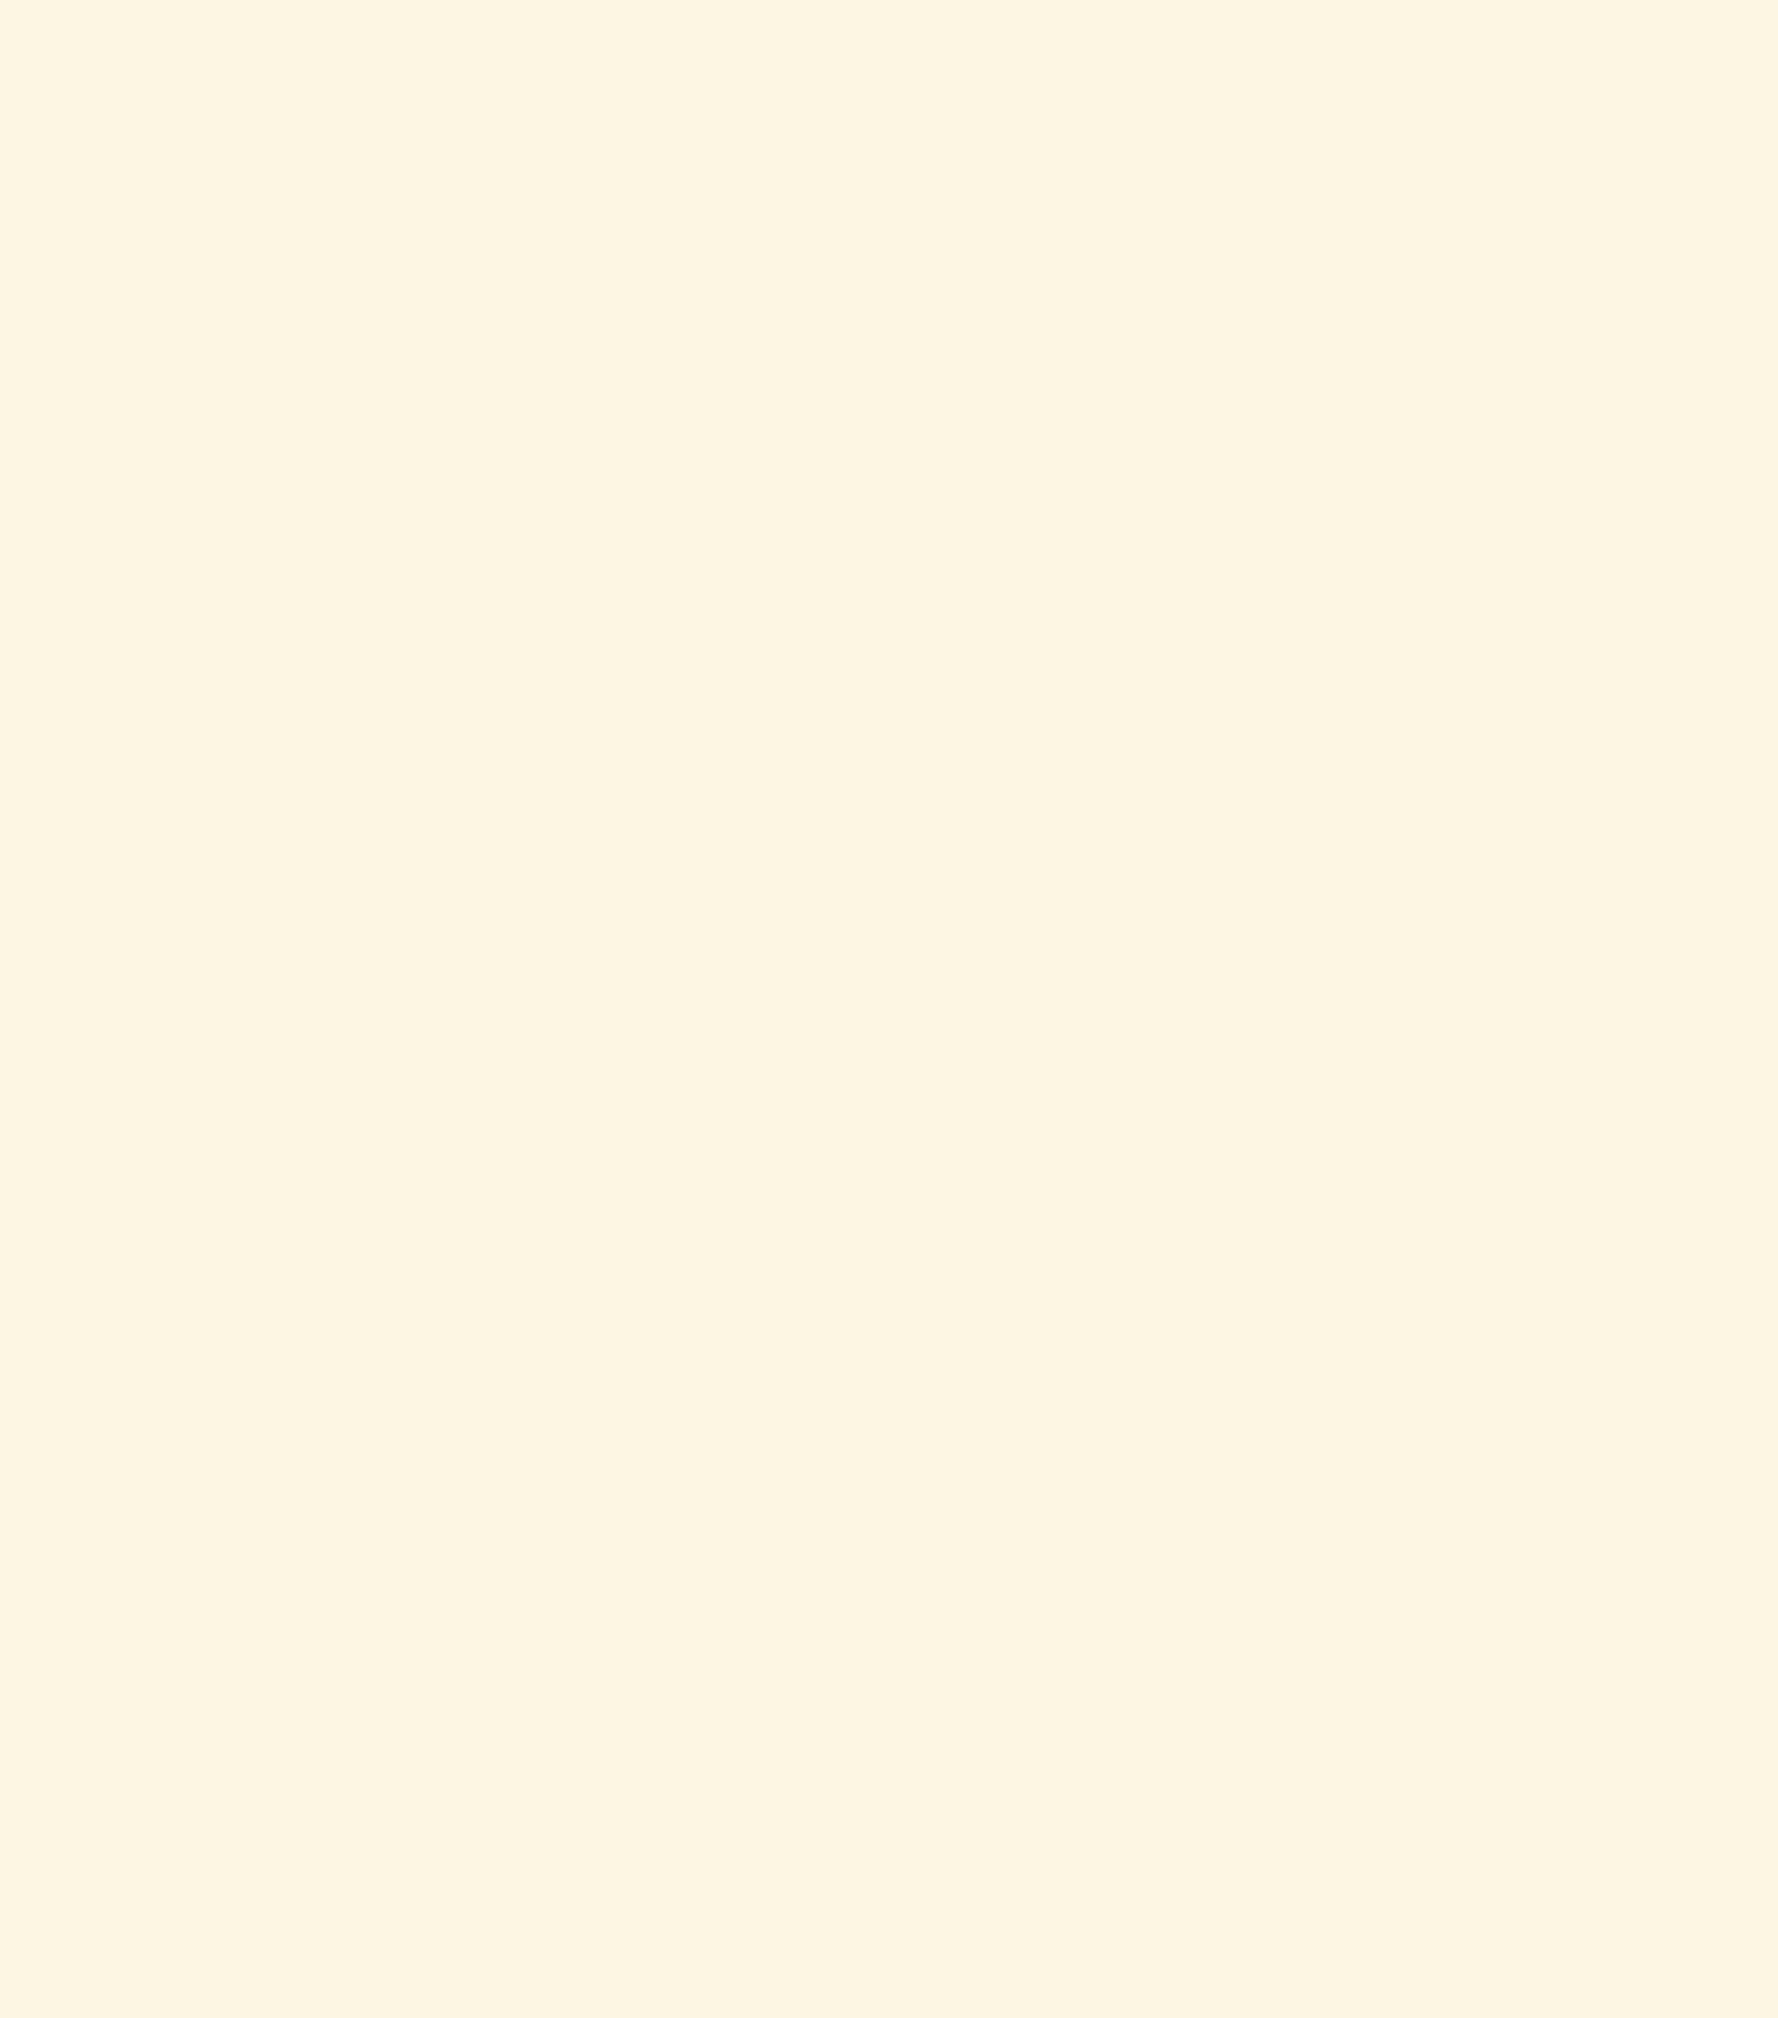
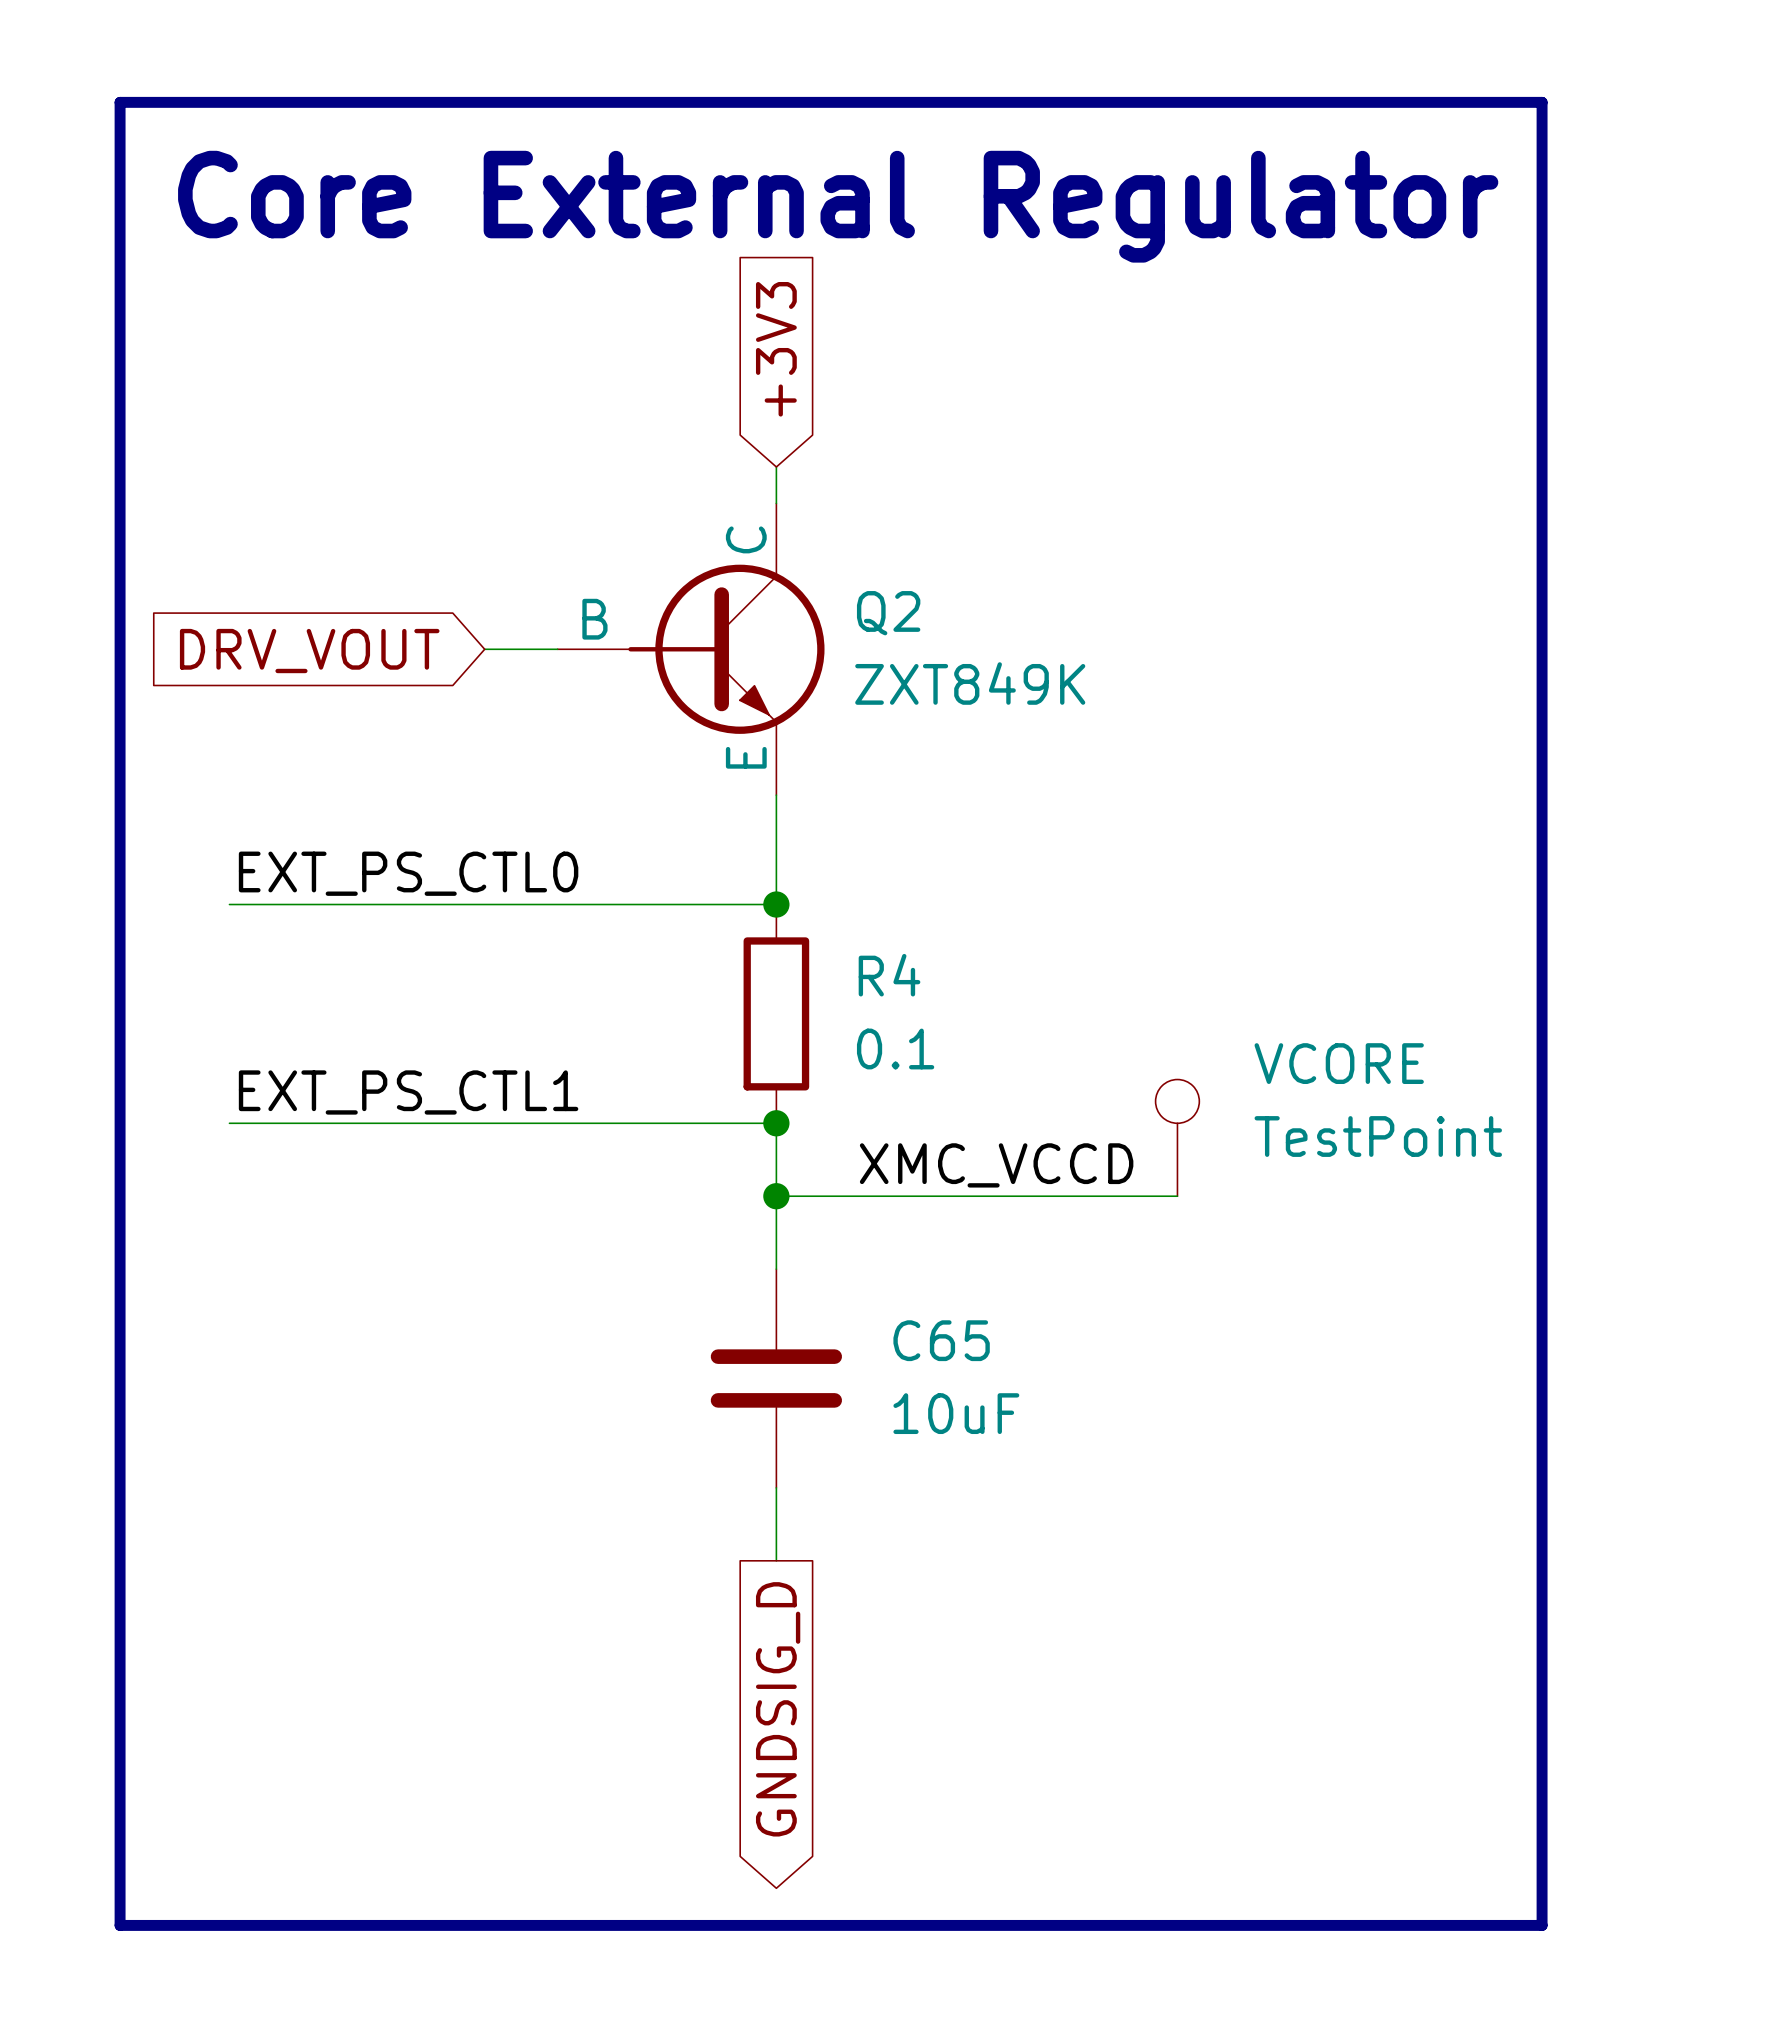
line: none -> (120, 102) (1542, 102) (1542, 1925) (120, 1925) (120, 102)
text: none -> Core External Regulator (838, 206)
global label: none -> +3V3 (776, 349)
wire: none -> (776, 466) (776, 503)
global label: none -> DRV_VOUT (309, 651)
wire: none -> (484, 649) (557, 649)
Q2: none -> ZXT849K (691, 649)
wire: none -> (776, 795) (776, 904) (229, 904)
label: none -> EXT_PS_CTL0 (408, 873)
junction: none -> (776, 904)
R4: none -> 0.1 (776, 1013)
label: none -> EXT_PS_CTL1 (408, 1092)
wire: none -> (229, 1123) (776, 1123) (776, 1269)
junction: none -> (776, 1123)
VCORE: none -> TestPoint (1177, 1137)
label: none -> XMC_VCCD (996, 1165)
wire: none -> (776, 1196) (1177, 1196)
junction: none -> (776, 1196)
C65: none -> 10uF (776, 1378)
wire: none -> (776, 1487) (776, 1560)
global label: none -> GNDSIG_D (778, 1709)

